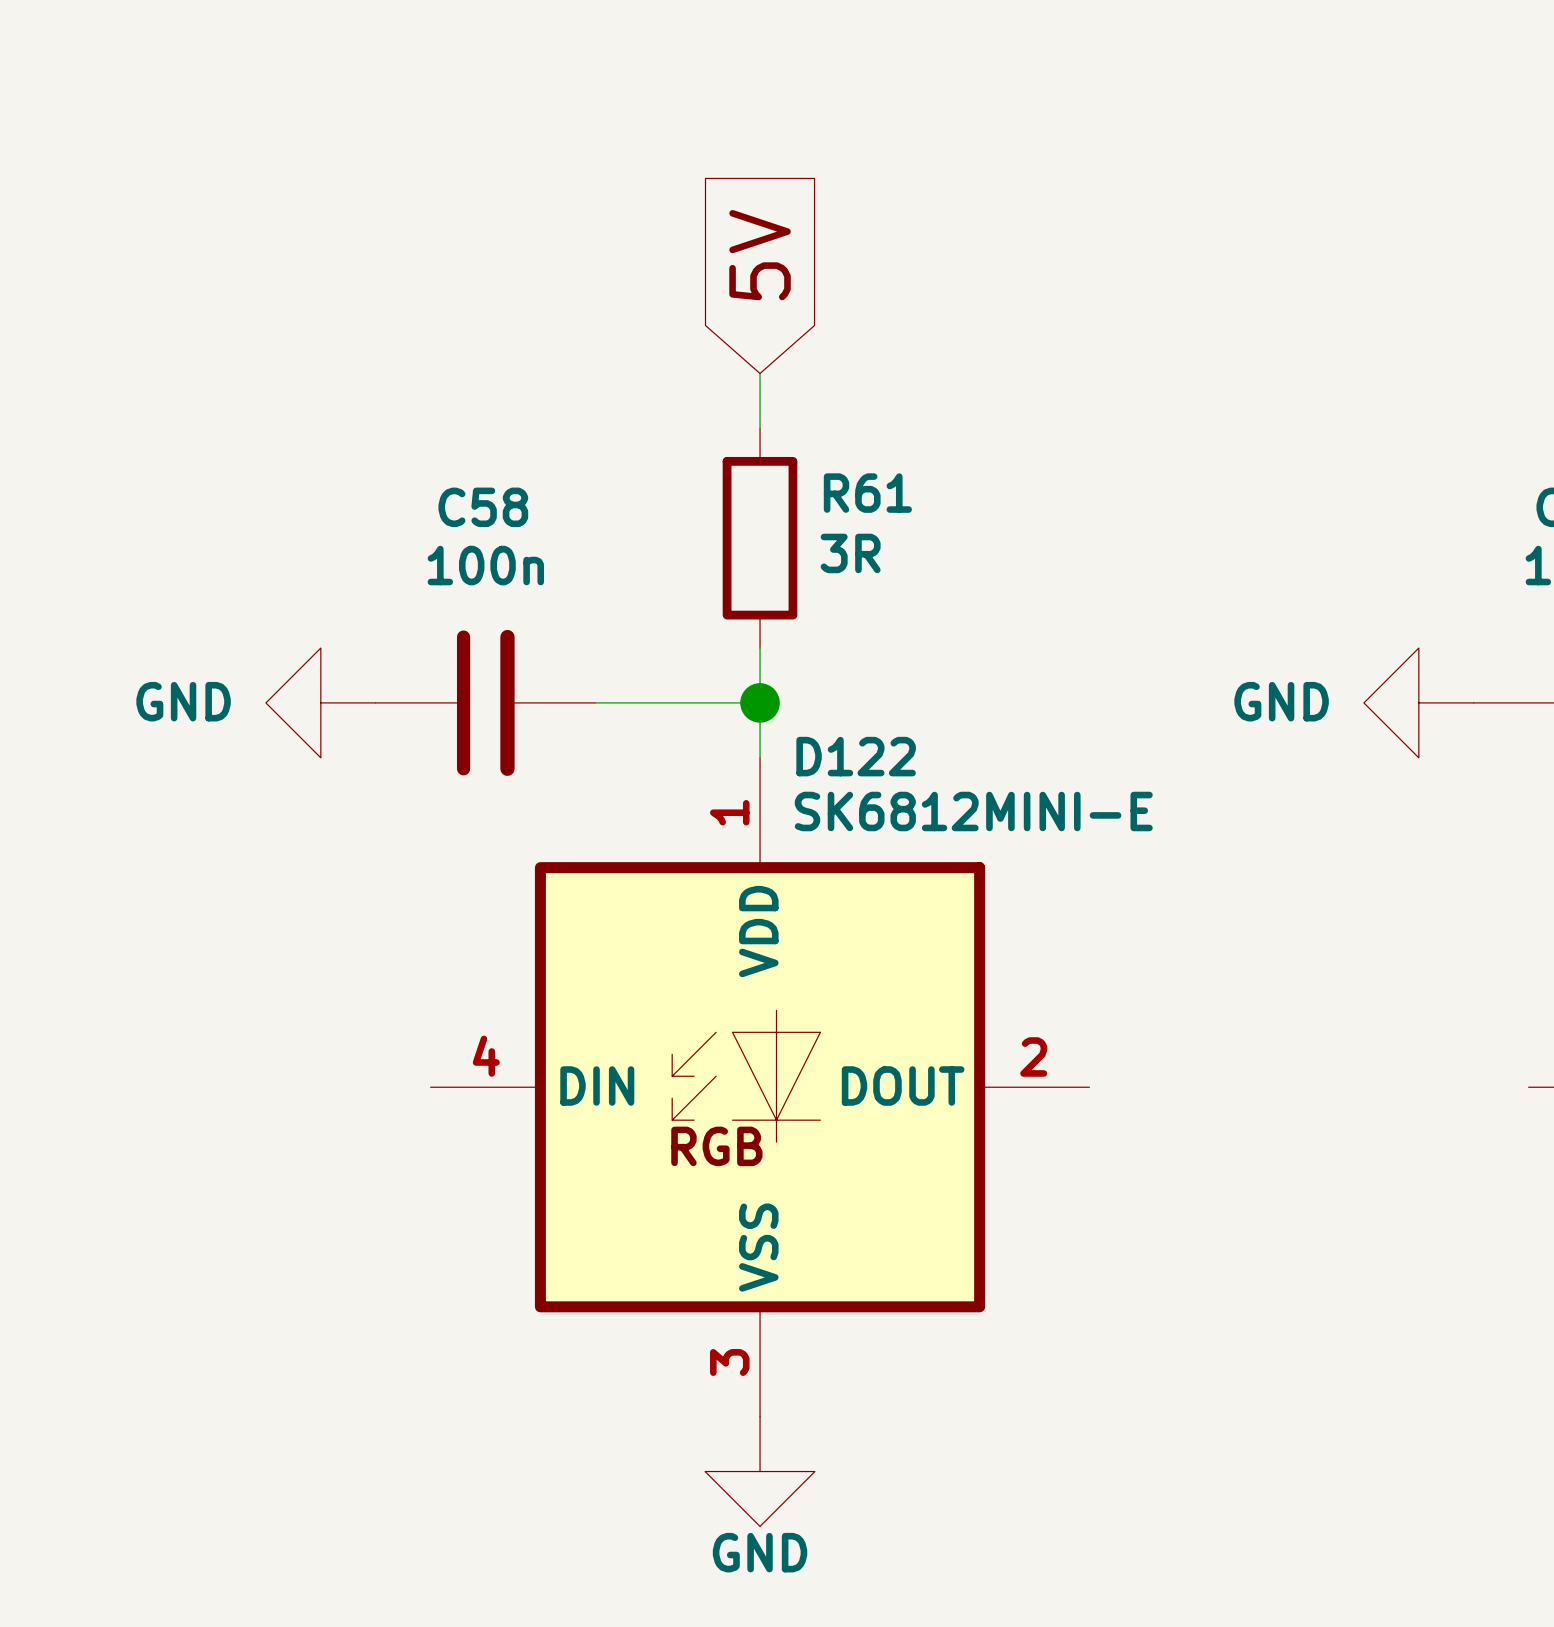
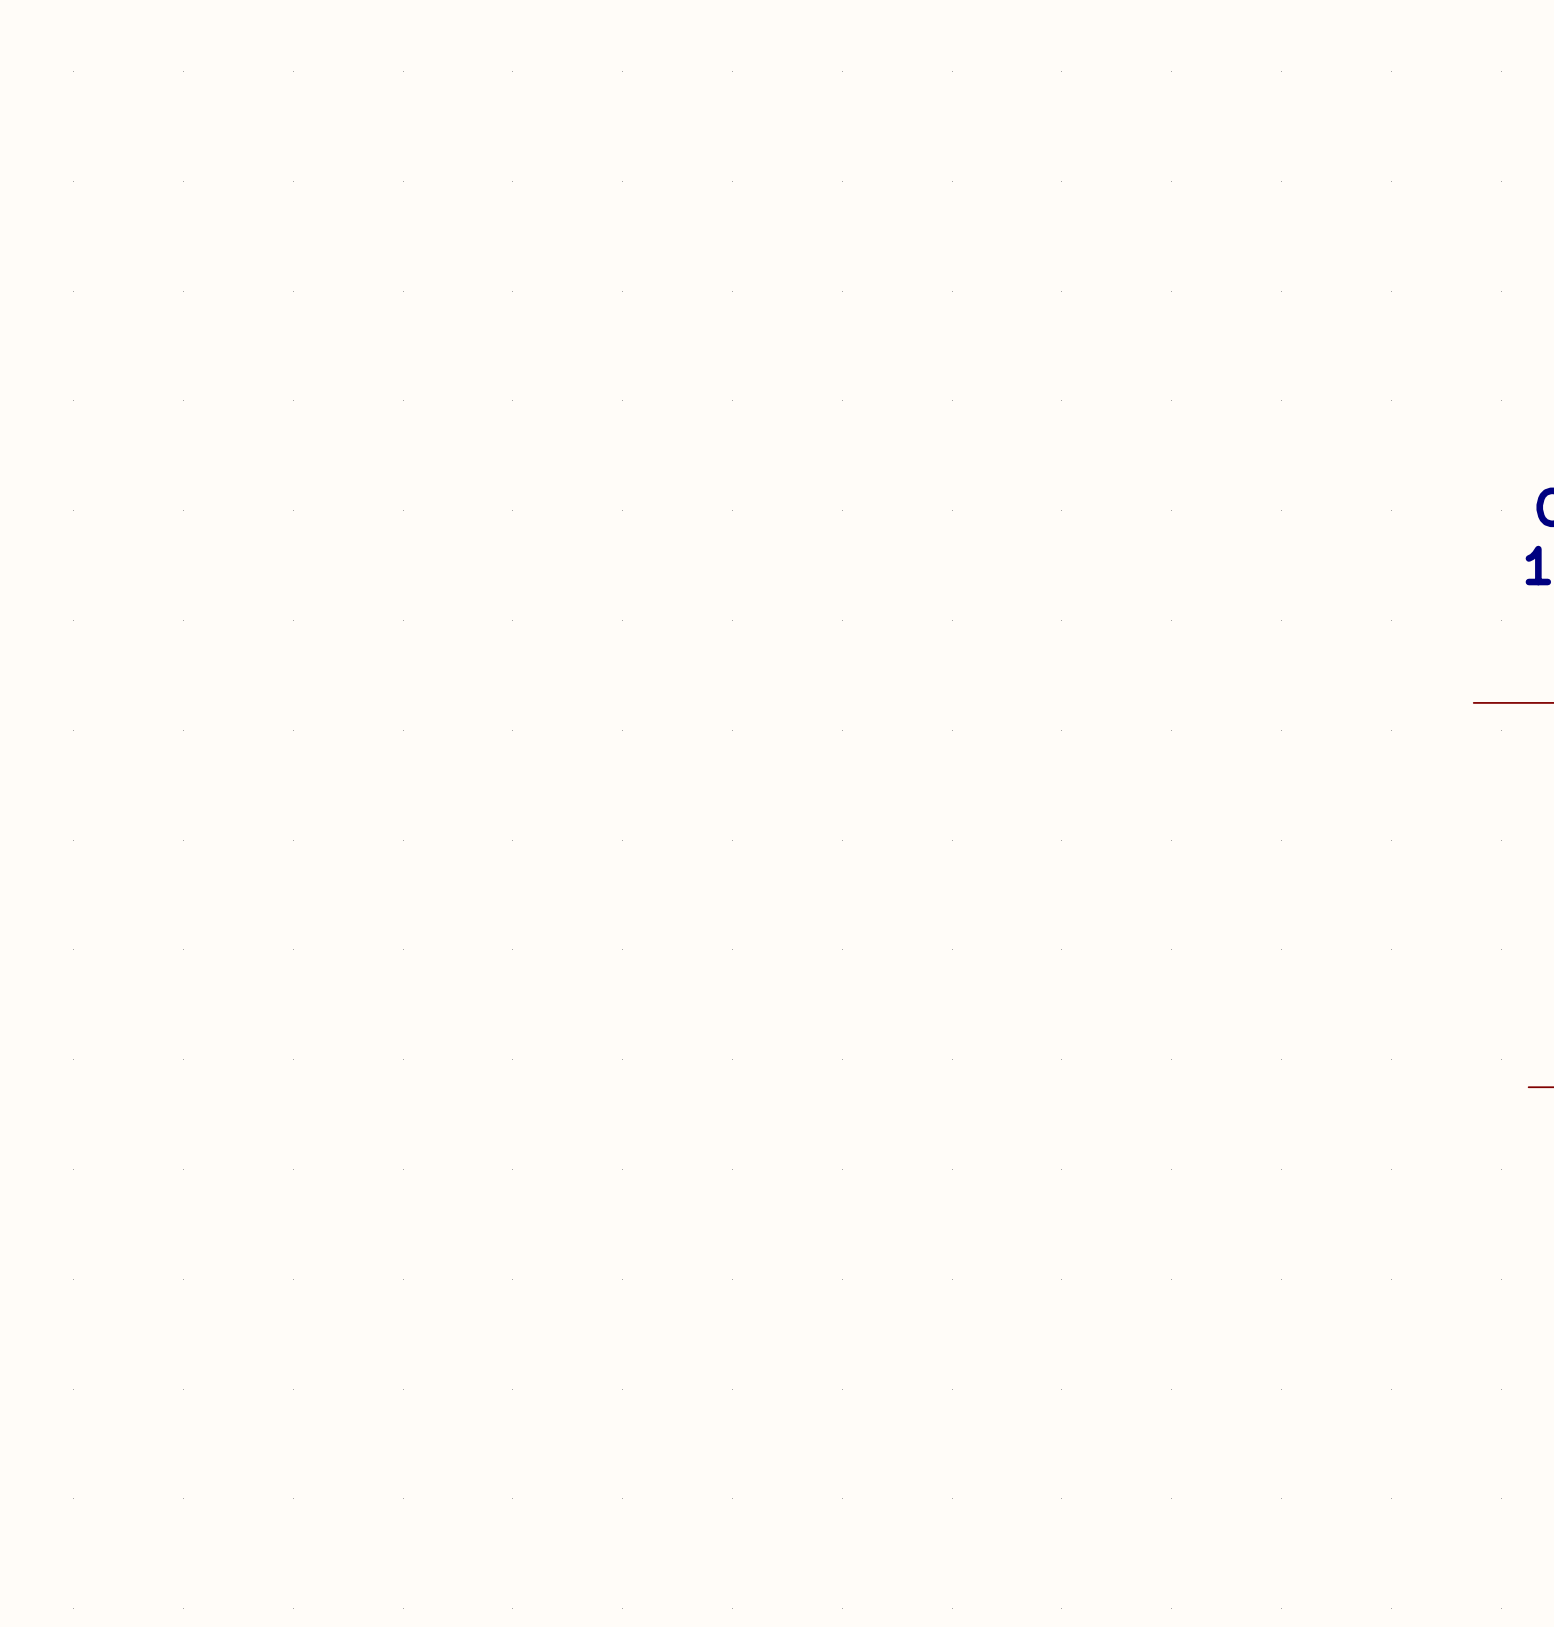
global label: 5V (760, 255) -> none
wire: (760, 373) (760, 428) -> none
R61: 3R (760, 538) -> none
wire: (760, 648) (760, 757) -> none
power symbol: GND (320, 702) -> none
C58: 100n (485, 702) -> none
wire: (595, 702) (760, 702) -> none
junction: (760, 702) -> none
power symbol: GND (1418, 702) -> none
D122: SK6812MINI-E (760, 1087) -> none
power symbol: GND (760, 1471) -> none

